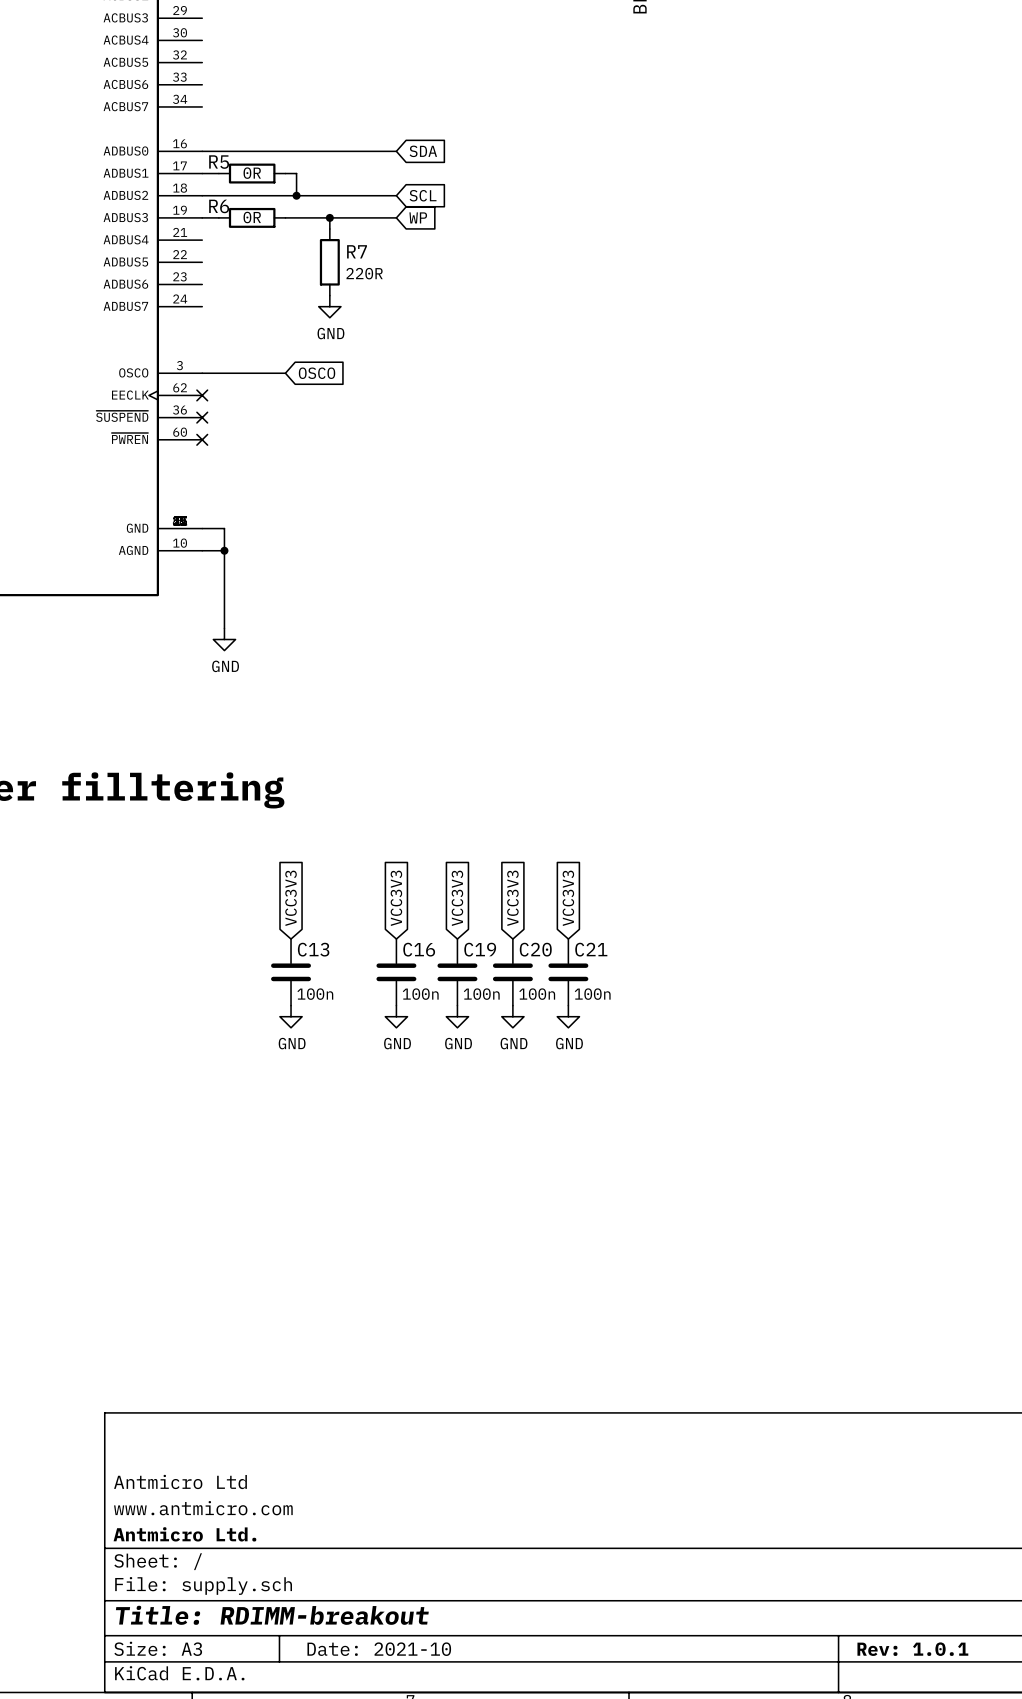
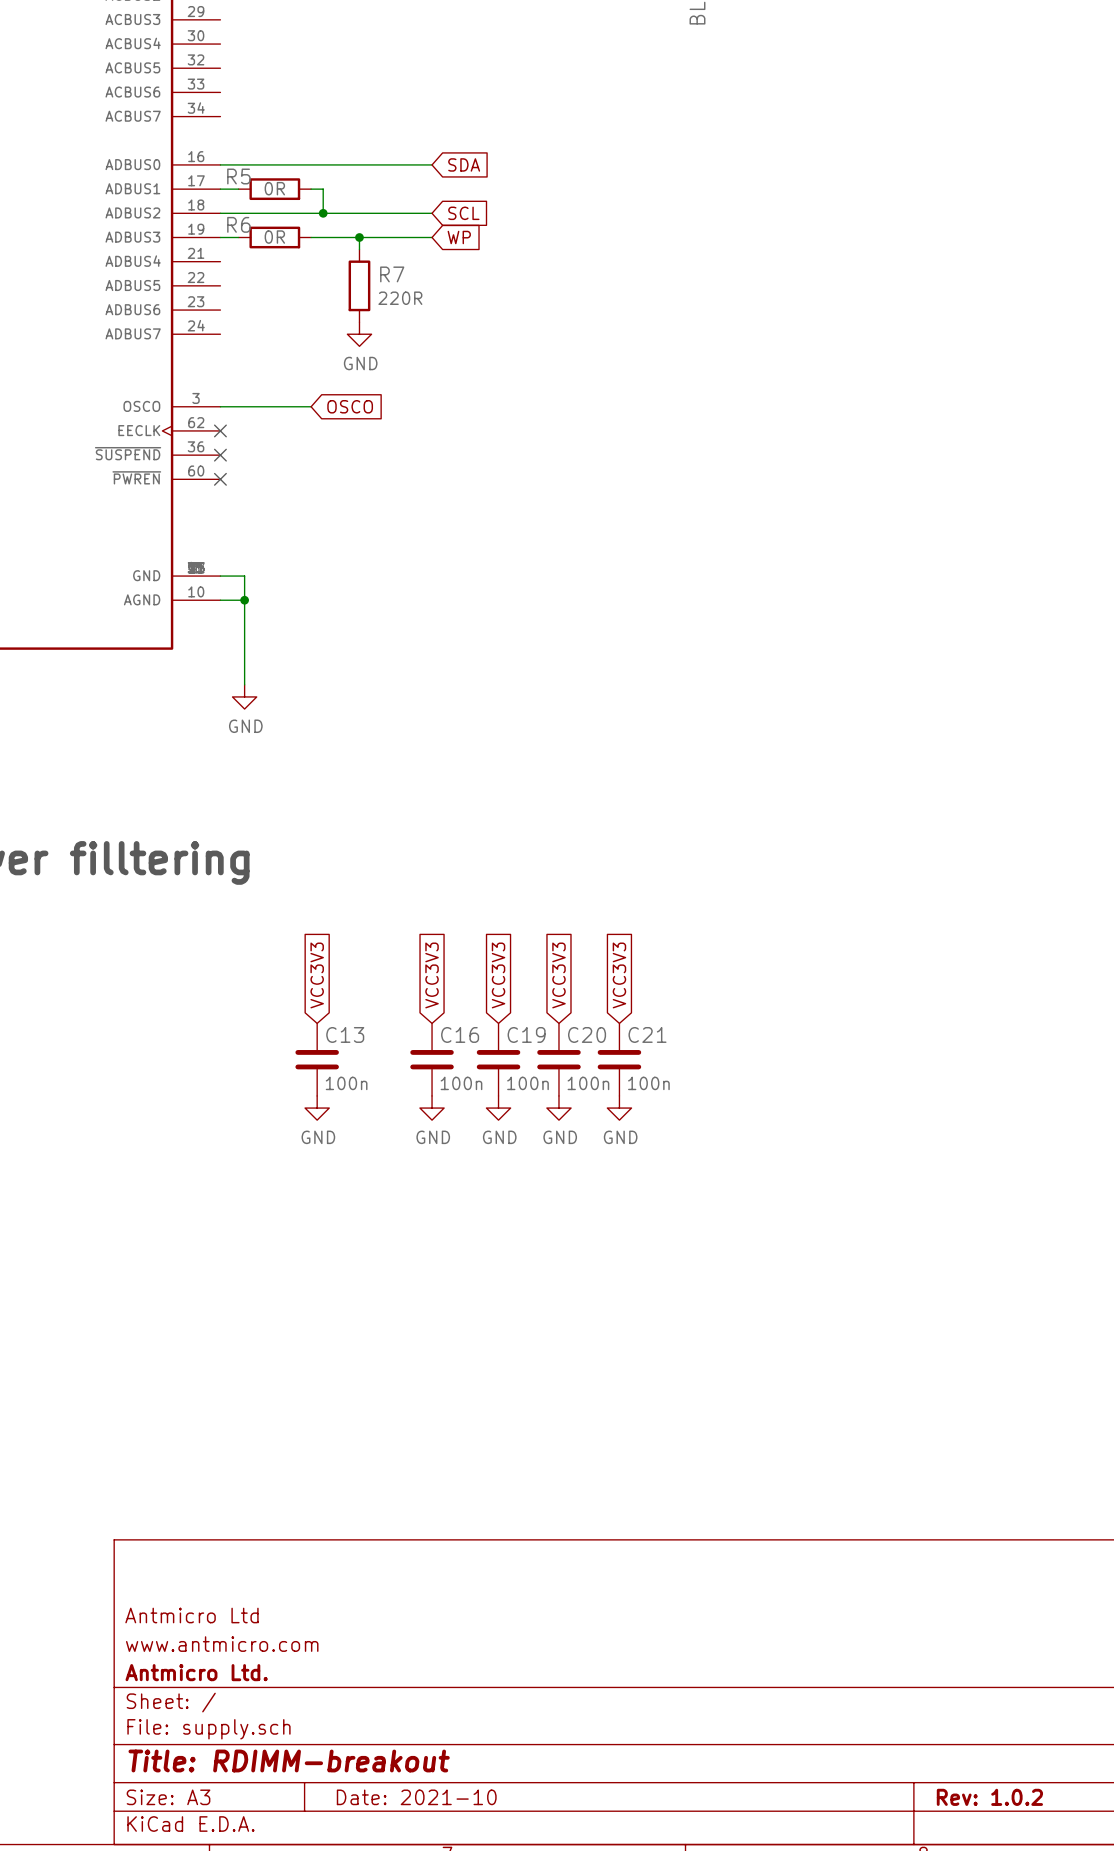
title block: Rev: 1.0.1 (912, 1649) -> Rev: 1.0.2 (989, 1797)

